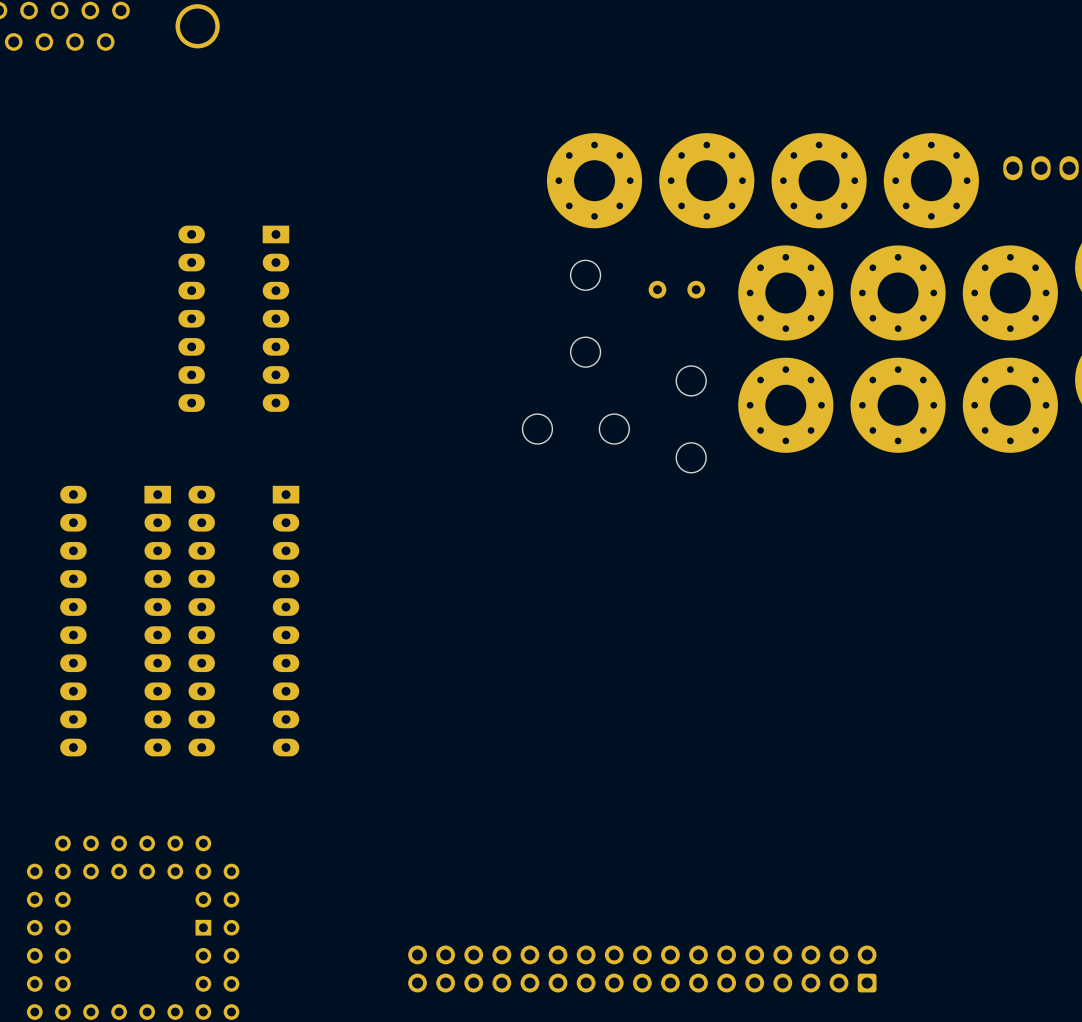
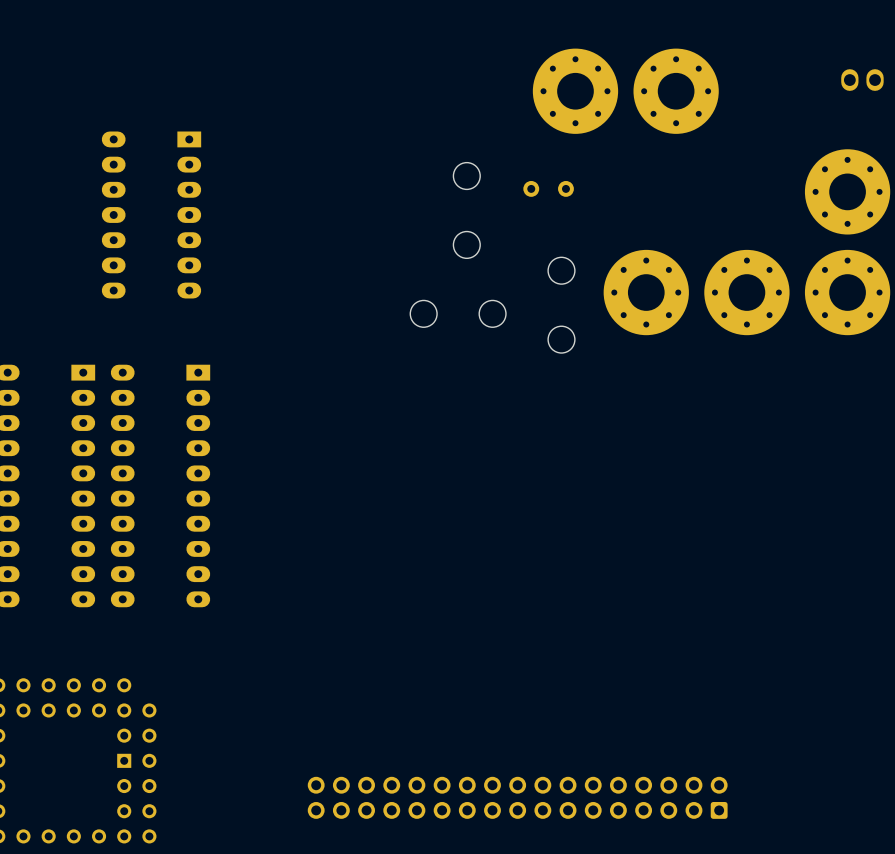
part: (594, 180) -> none
part: (931, 180) -> none
part: (785, 292) -> none
part: (898, 292) -> none

